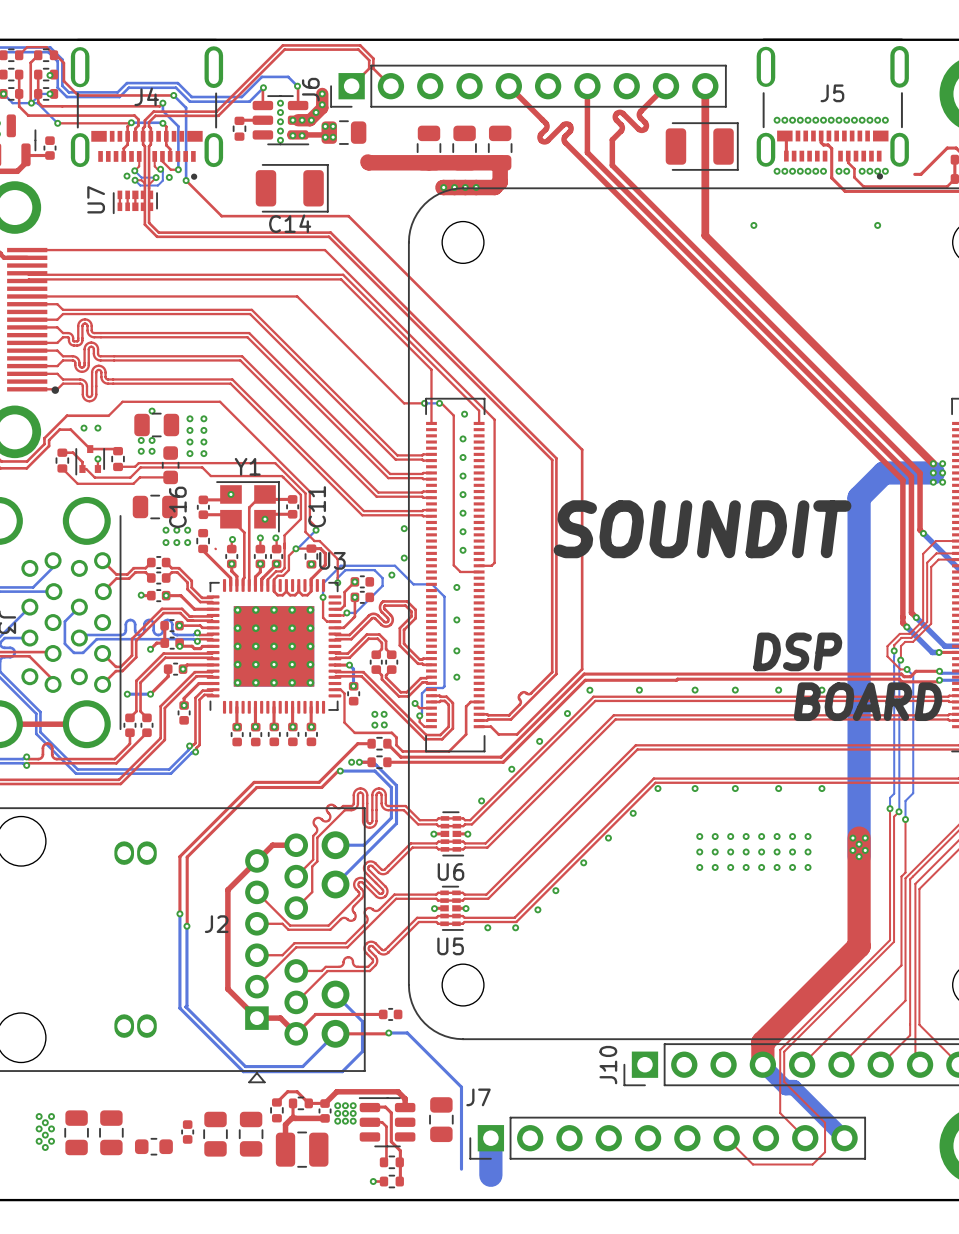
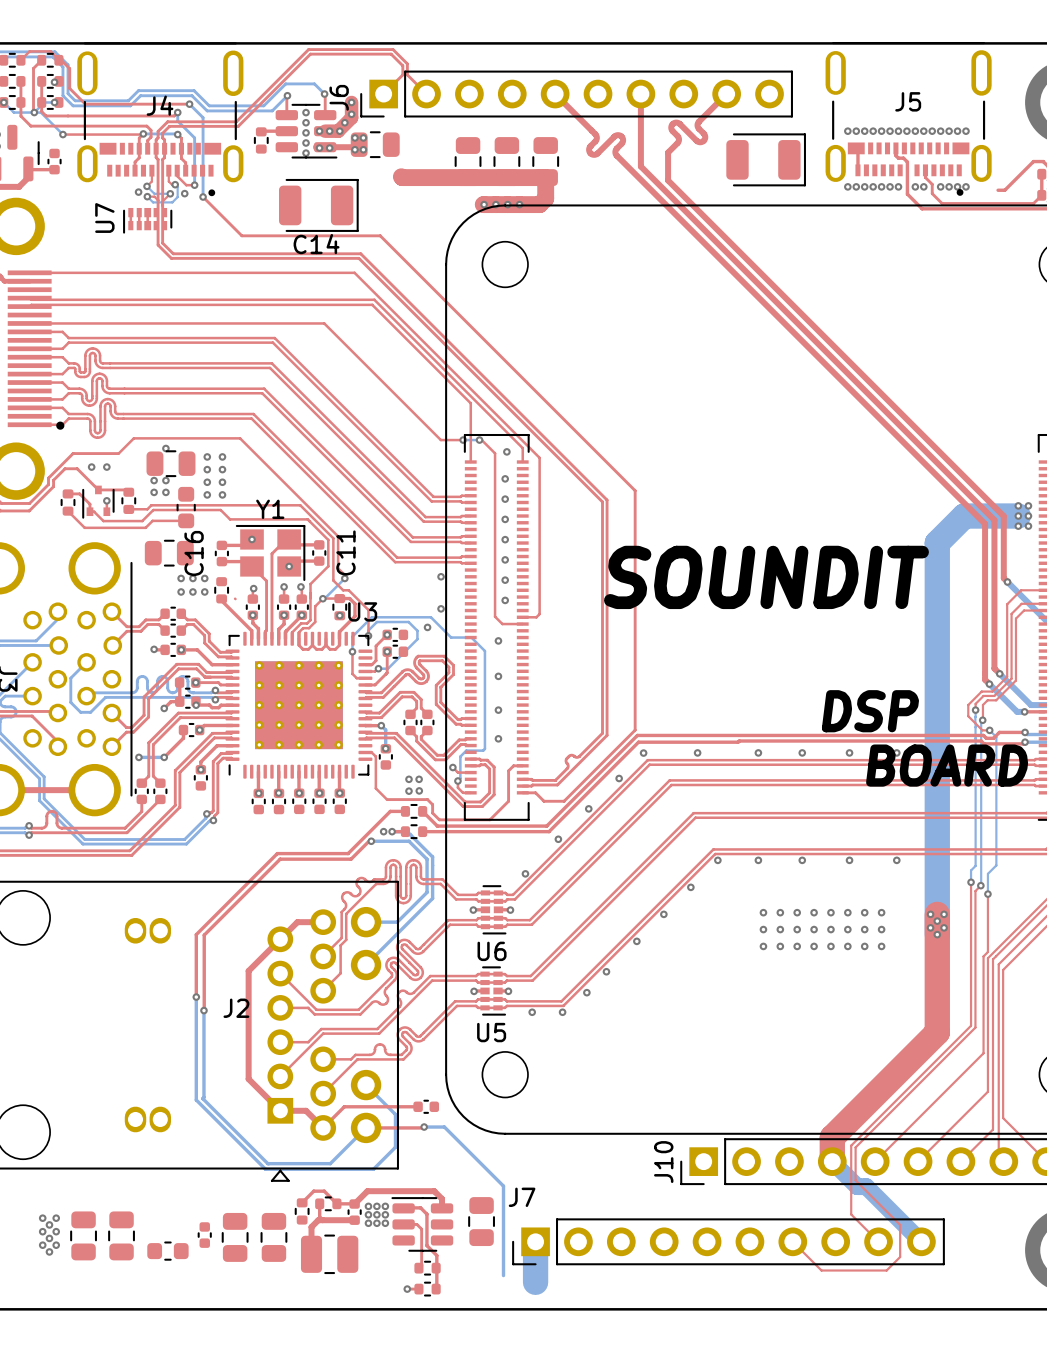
top track: (705, 86) (705, 235) (933, 463) -> none
via: (753, 225) -> none
via: (877, 225) -> none

